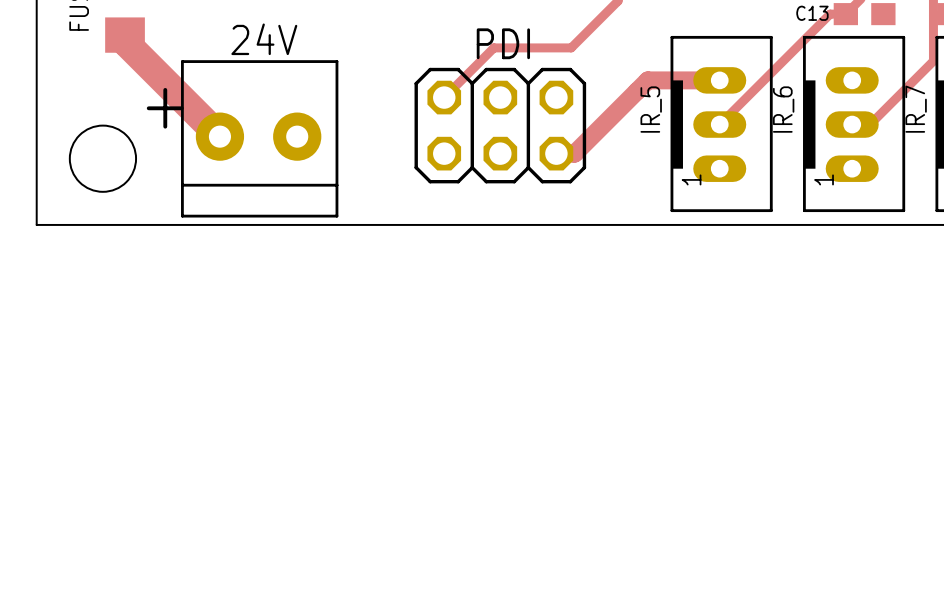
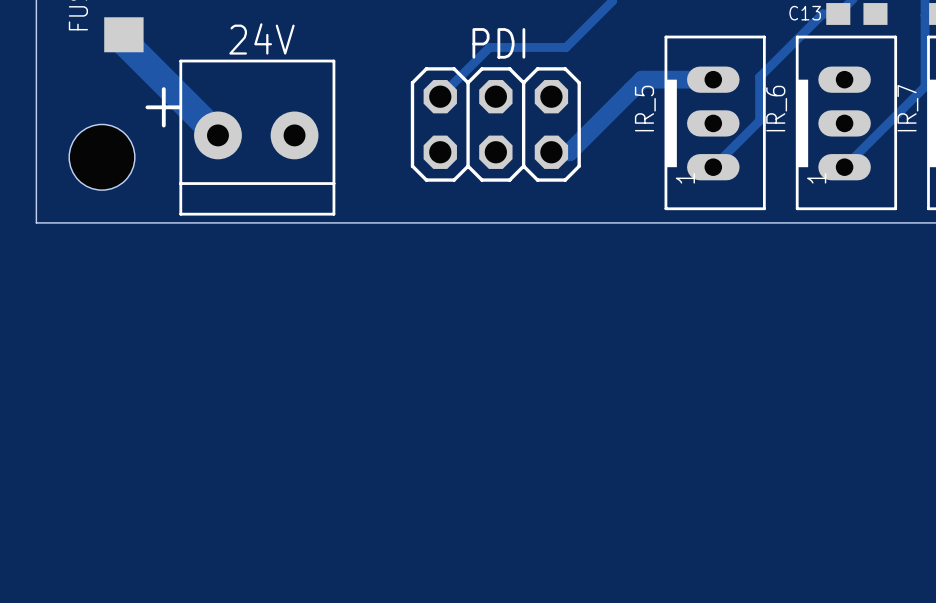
track: (933, 61) (870, 124) (852, 124) -> (925, 60) (925, 86) (844, 167)
track: (766, 77) (719, 124) -> (759, 77) (759, 120) (713, 167)

